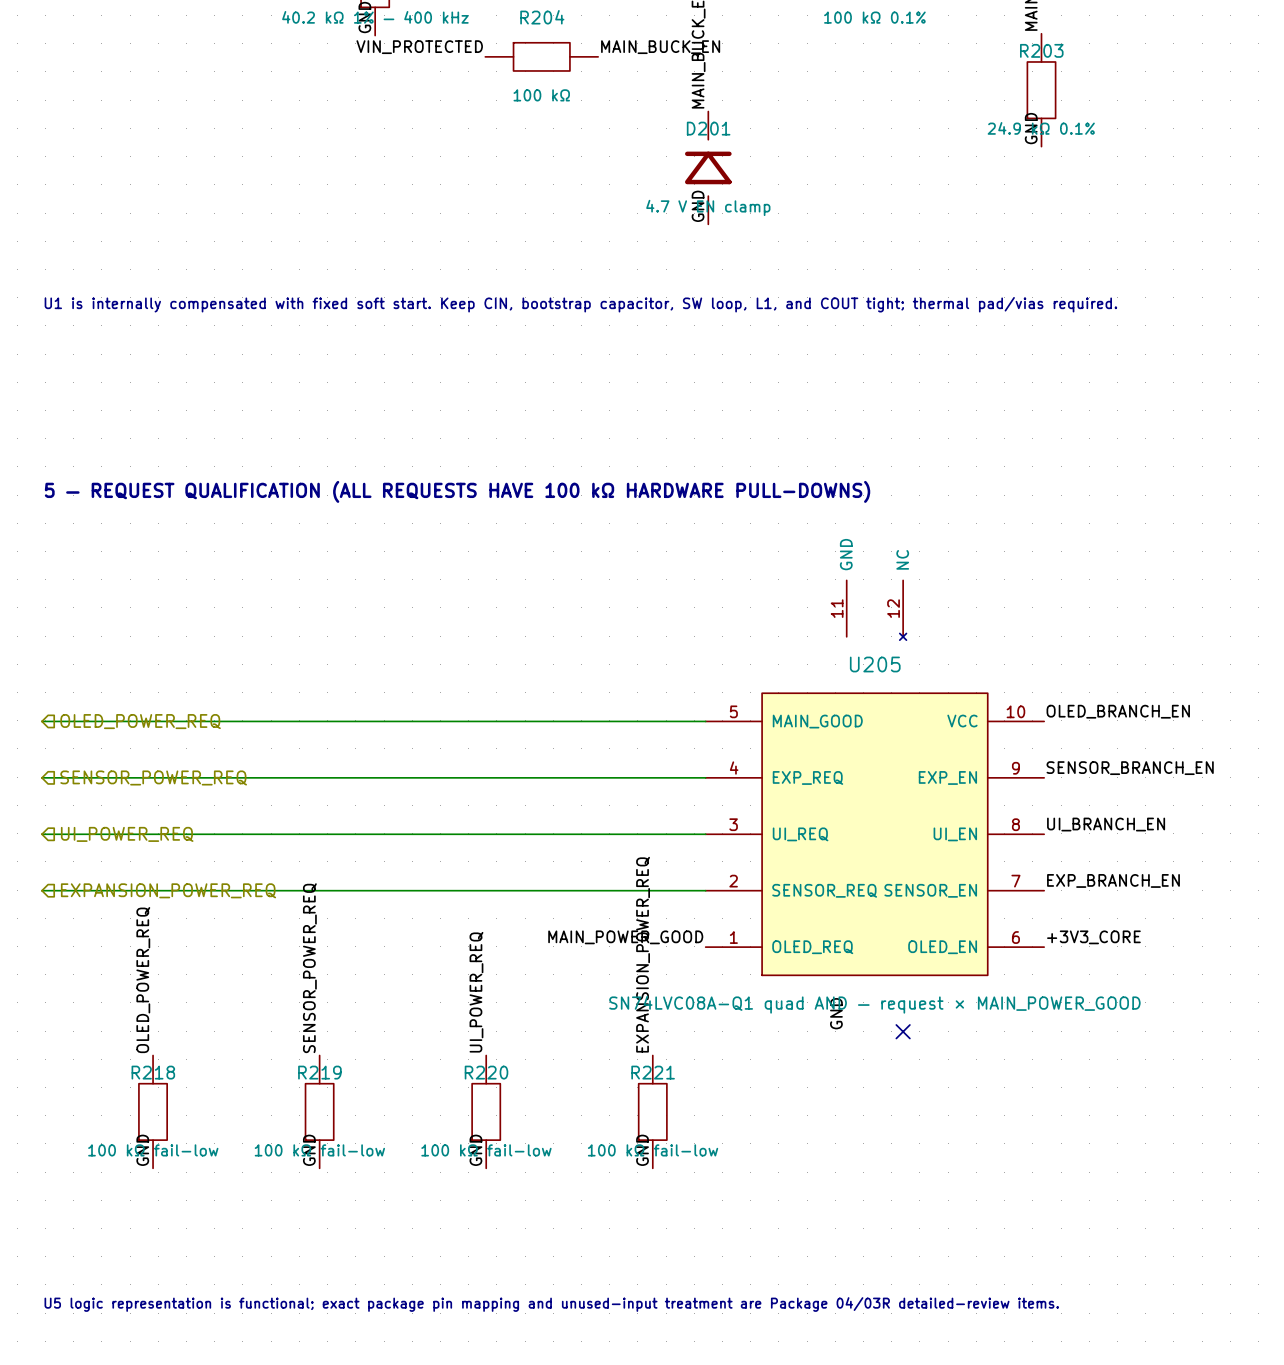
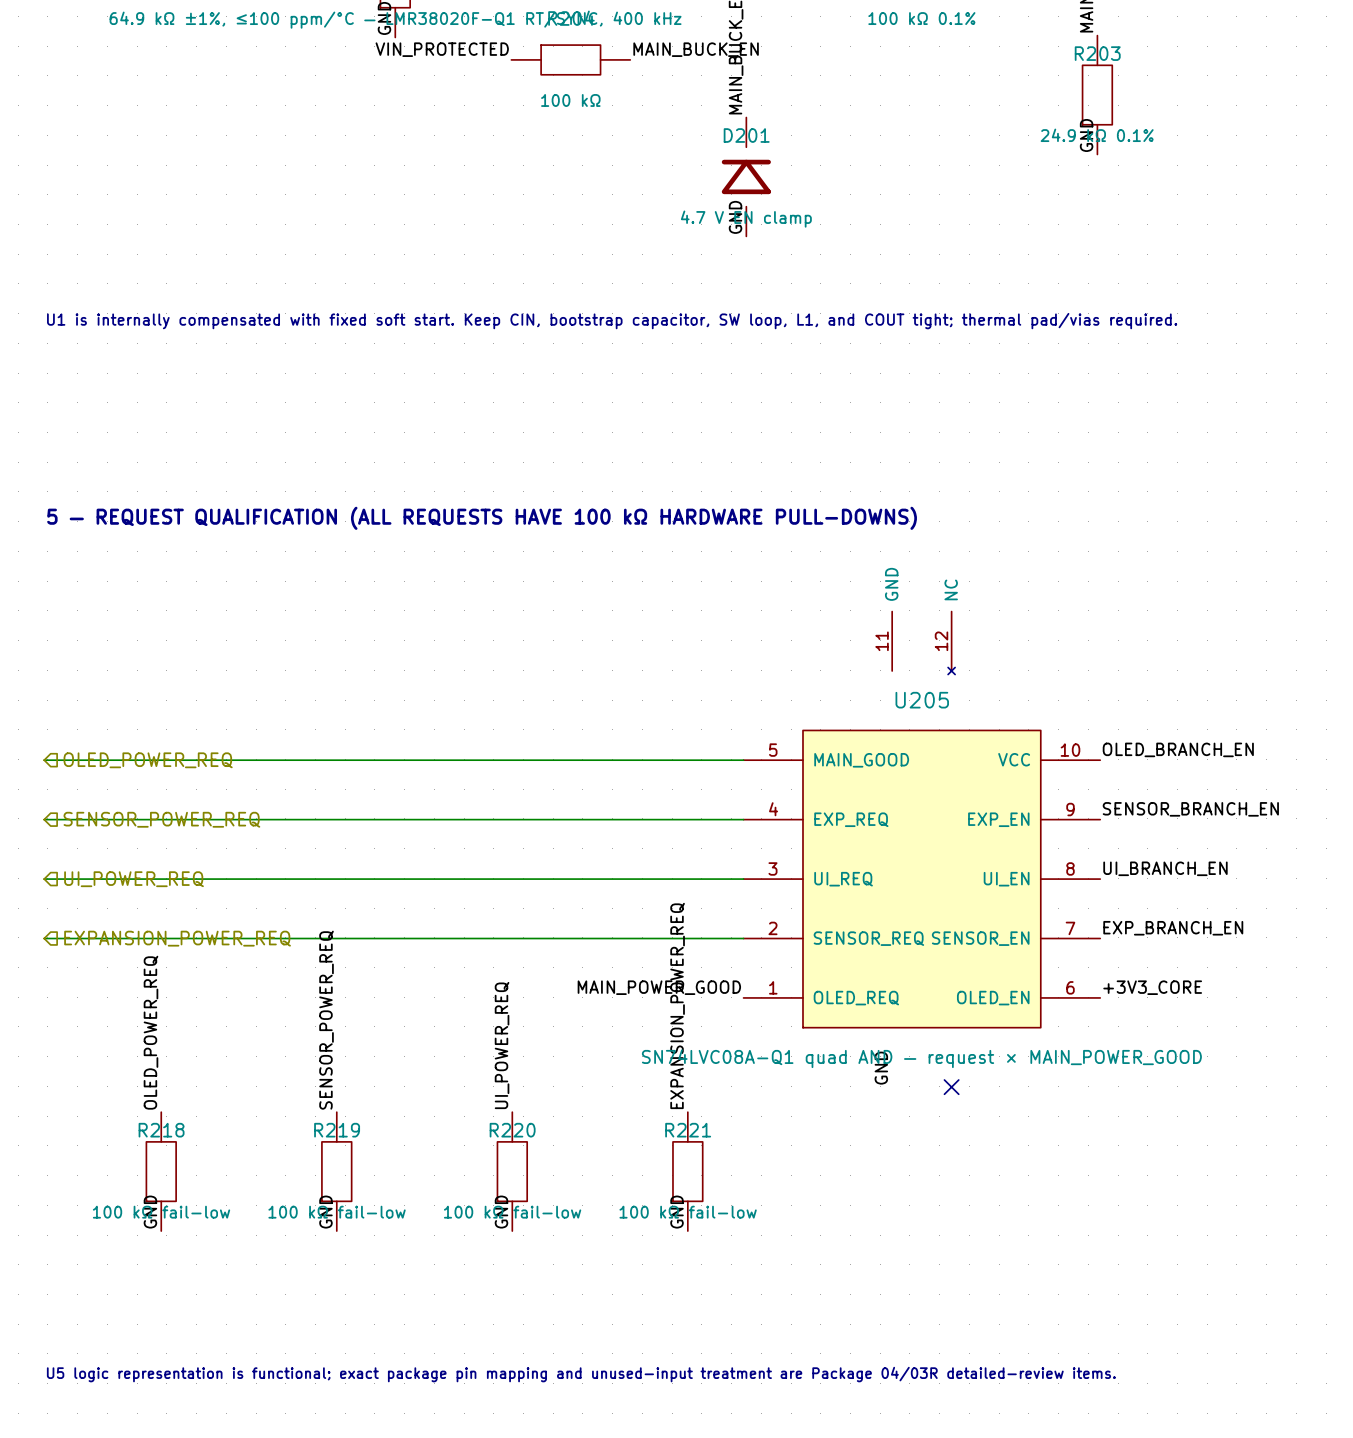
part value: 40.2 kΩ 1% — 400 kHz (375, 17) -> 64.9 kΩ ±1%, ≤100 ppm/°C — LMR38020F-Q1 RT/SYNC, 400 kHz (395, 20)

